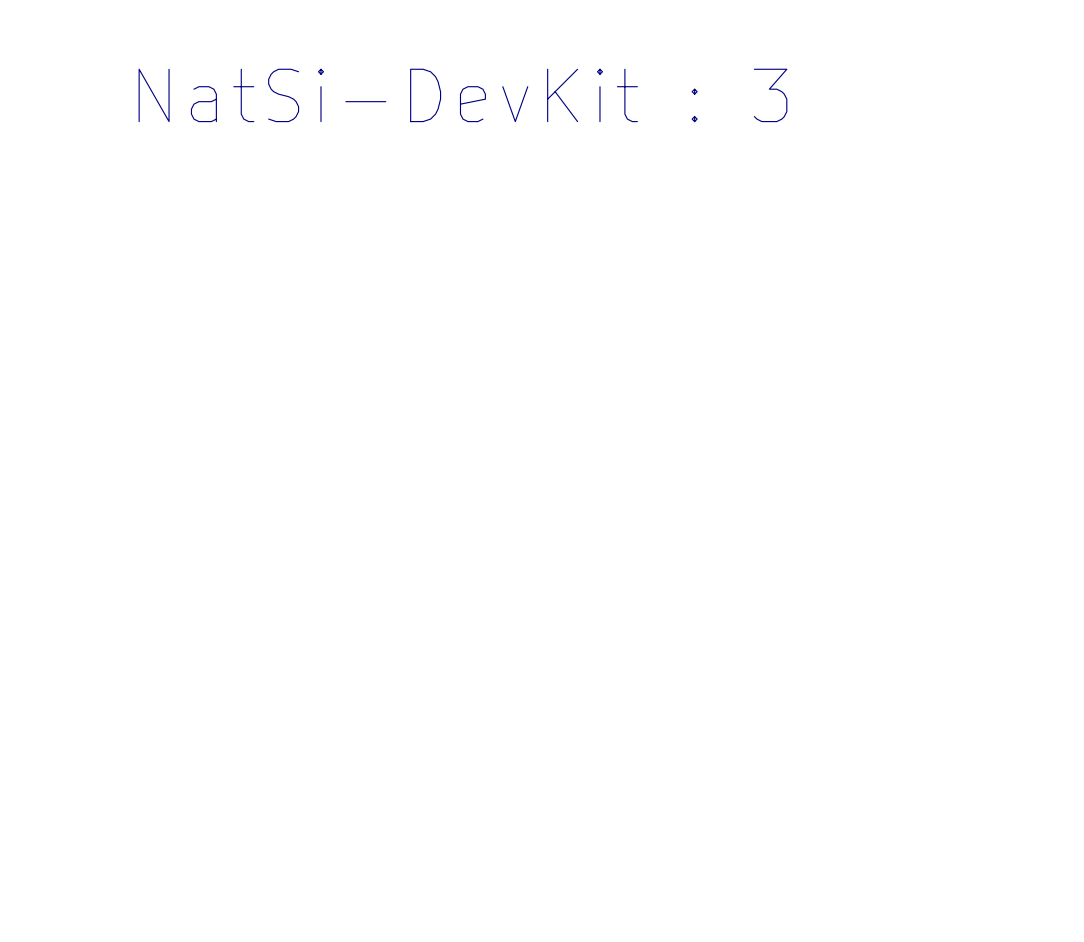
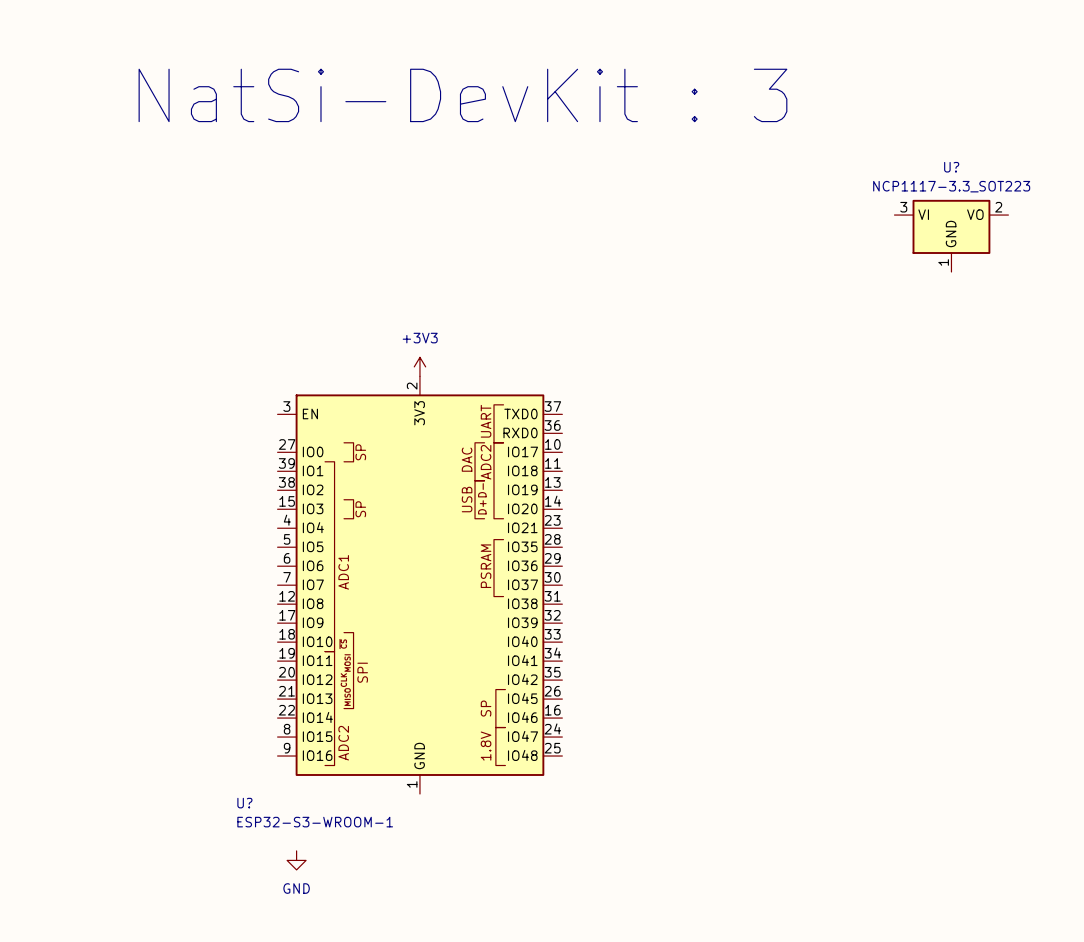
U?: none -> NCP1117-3.3_SOT223 (951, 235)
power symbol: none -> +3V3 (419, 366)
U?: none -> ESP32-S3-WROOM-1 (419, 585)
power symbol: none -> GND (296, 860)

